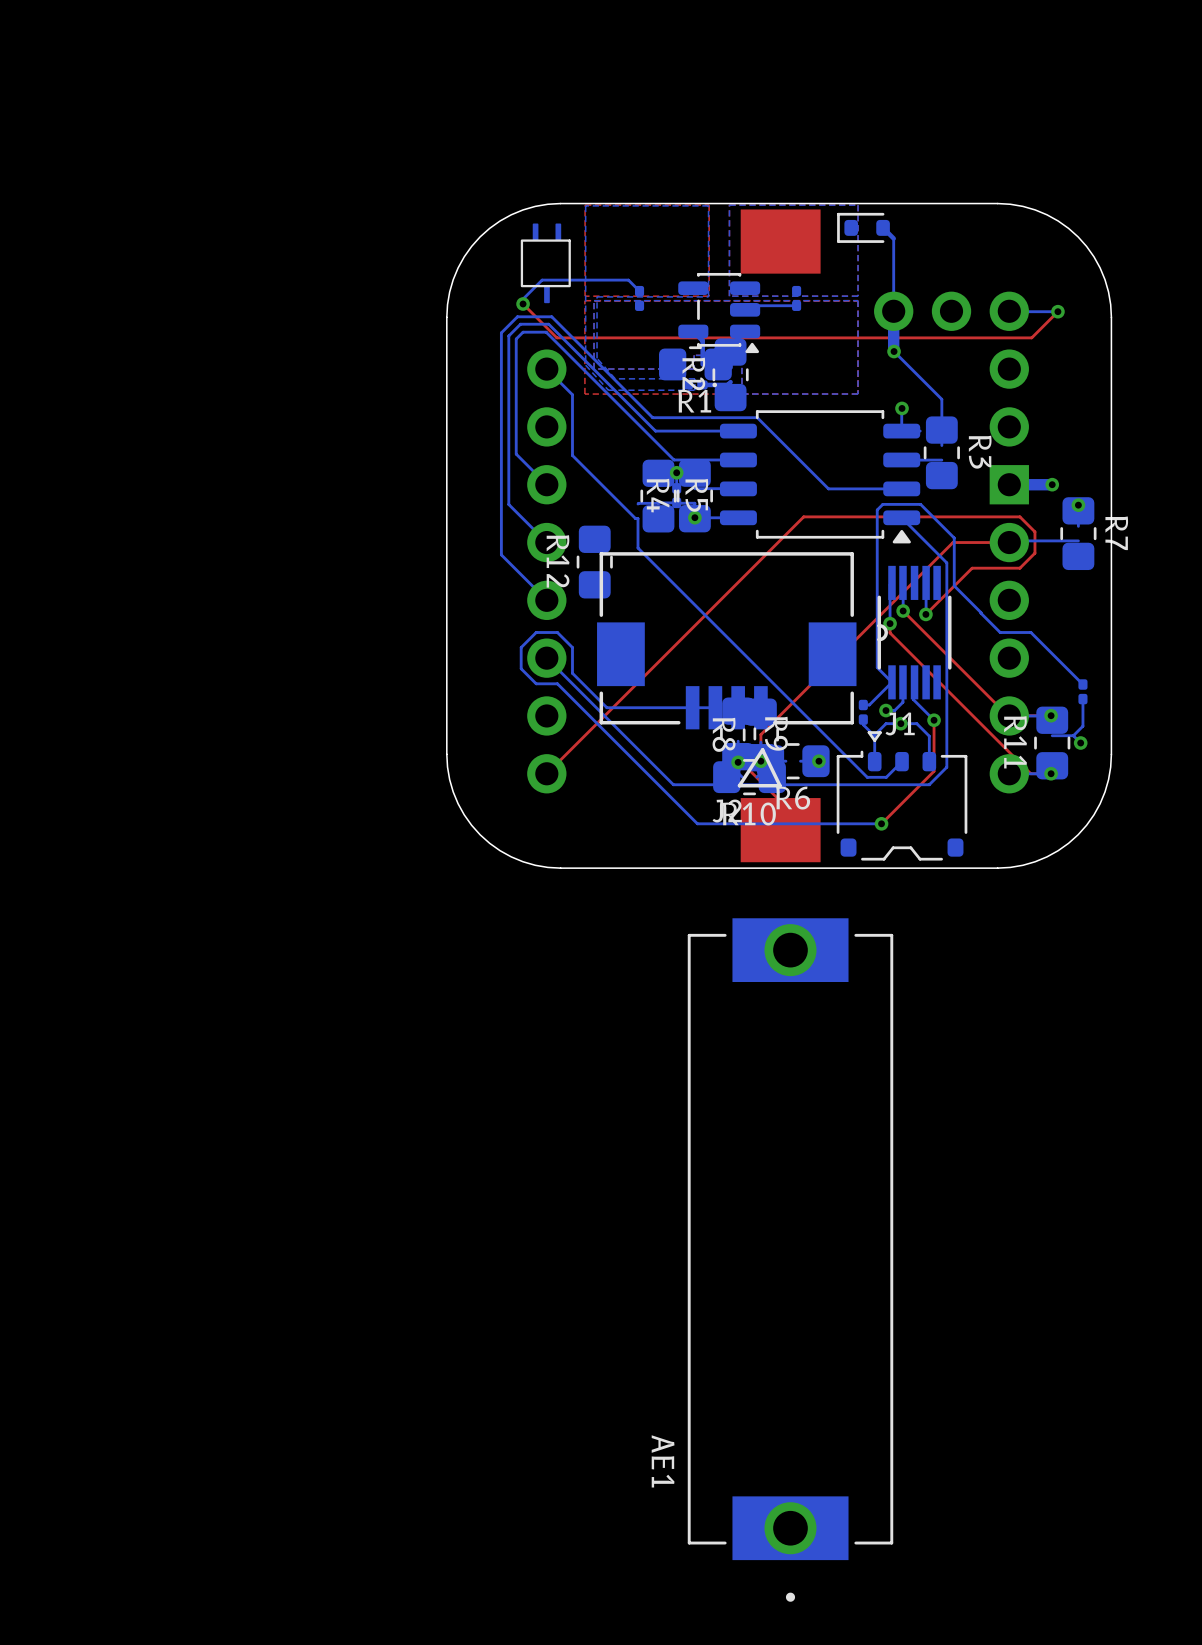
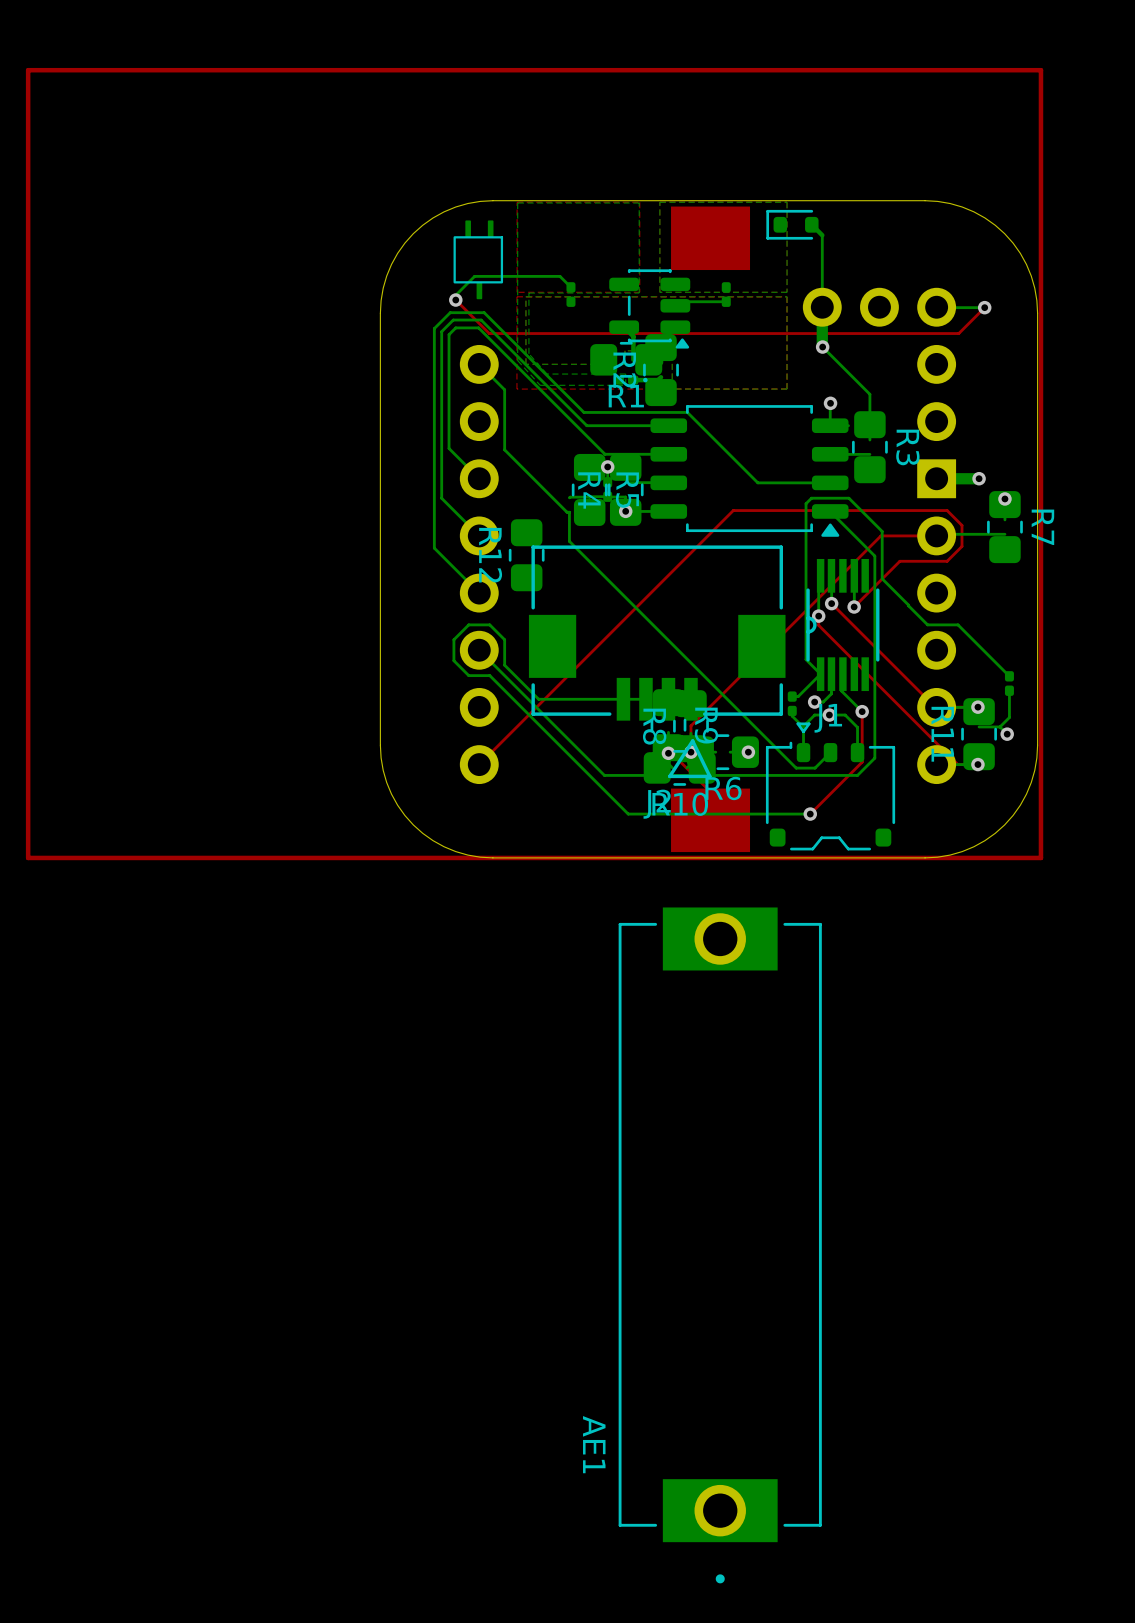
top track: none -> (1040, 70) (28, 70) (28, 857) (1040, 857) (1040, 70)

